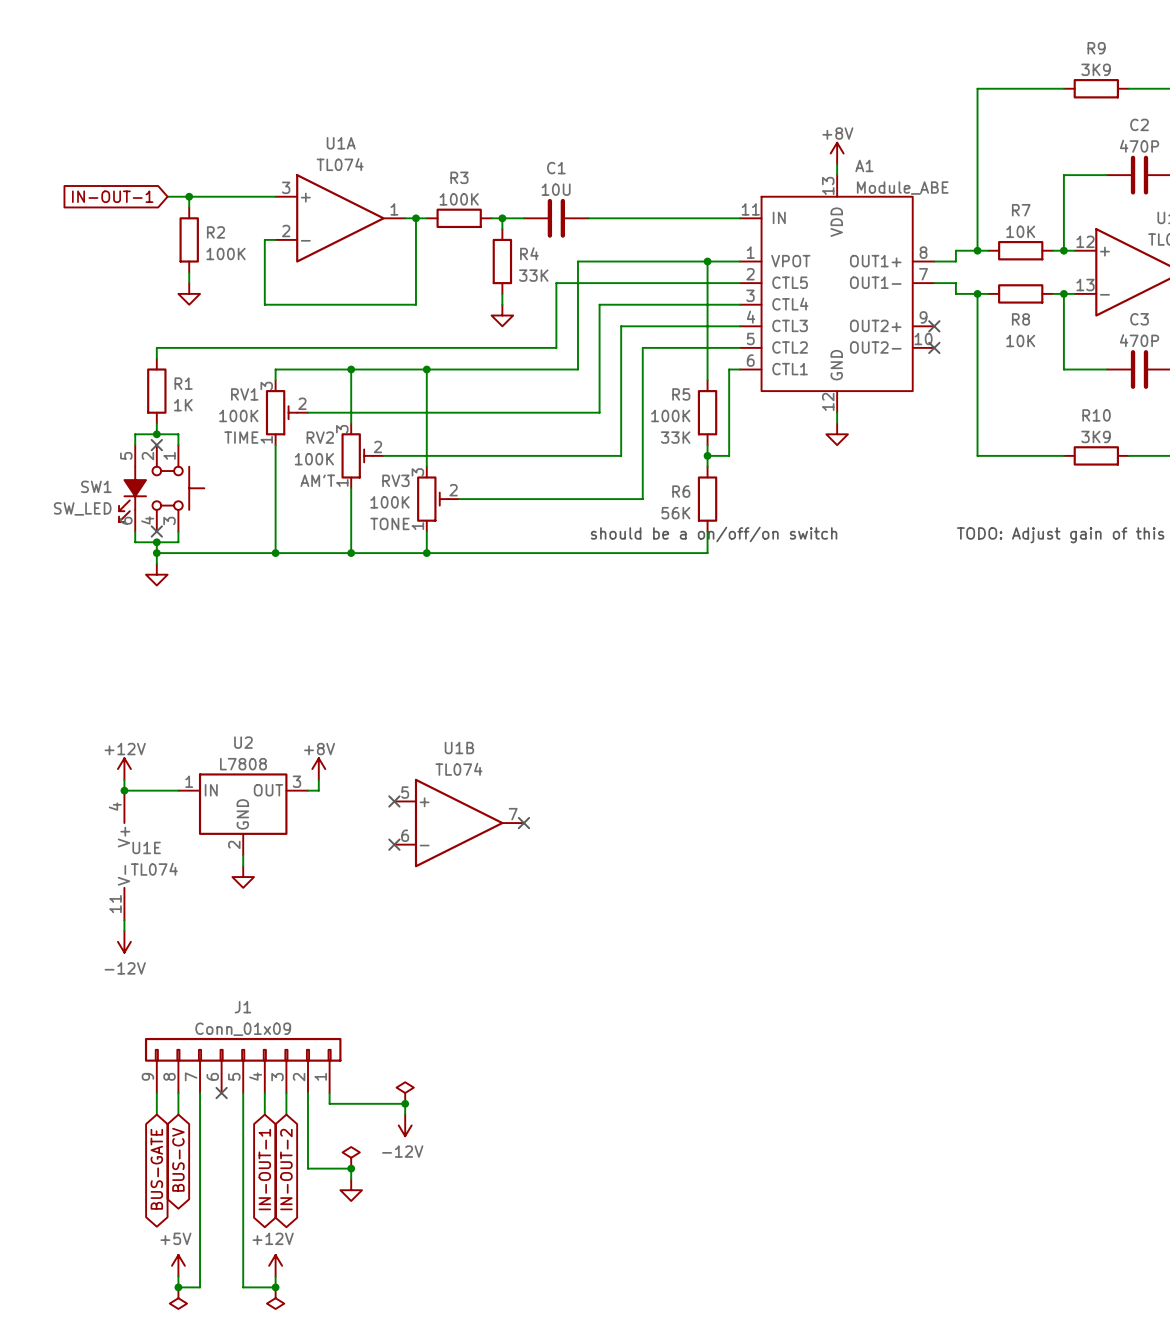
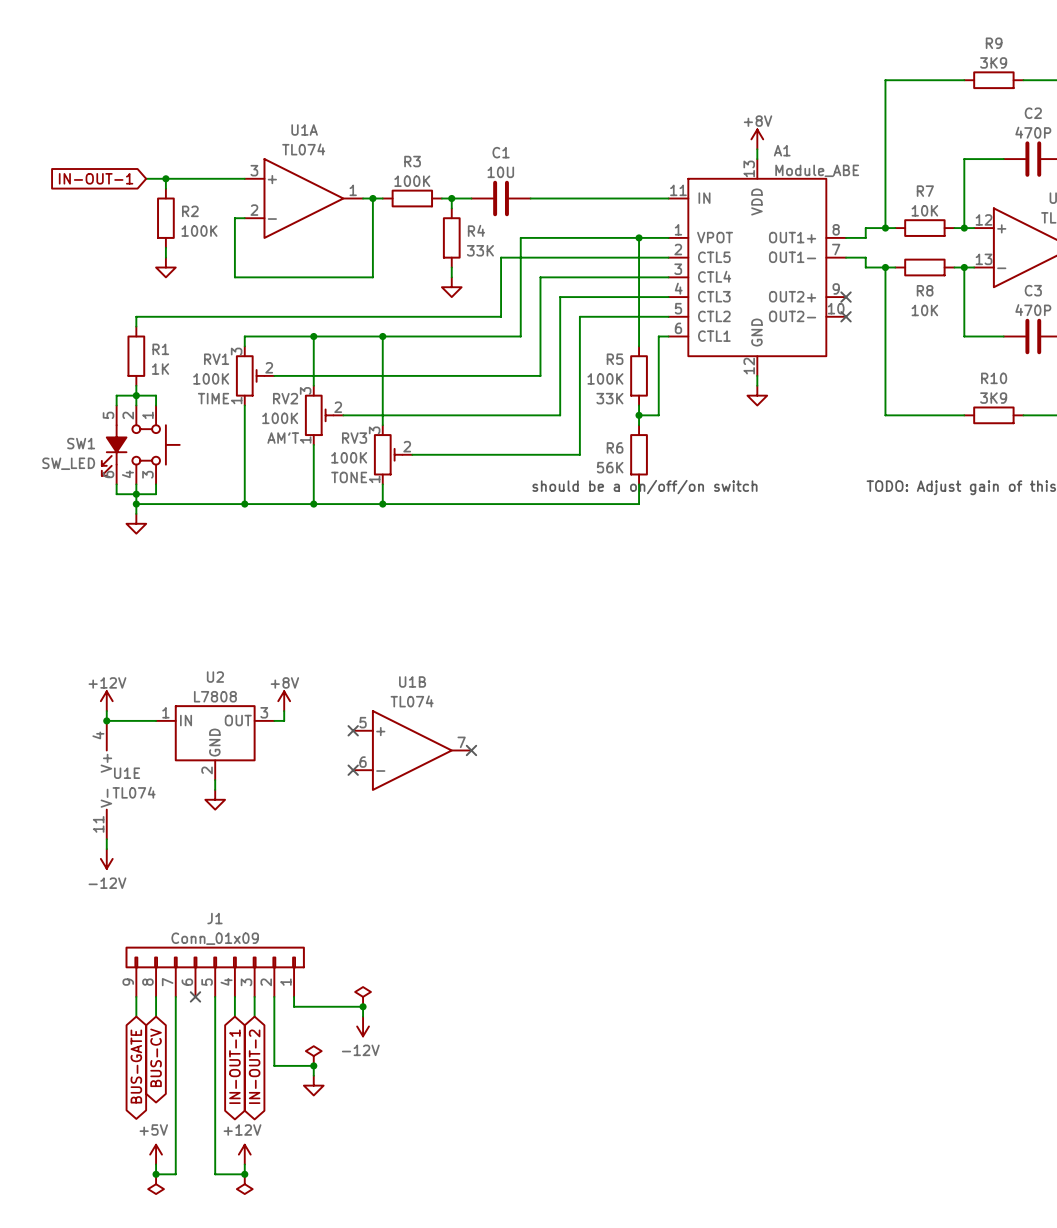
no-connect mark: (156, 445) -> none
no-connect mark: (156, 531) -> none

